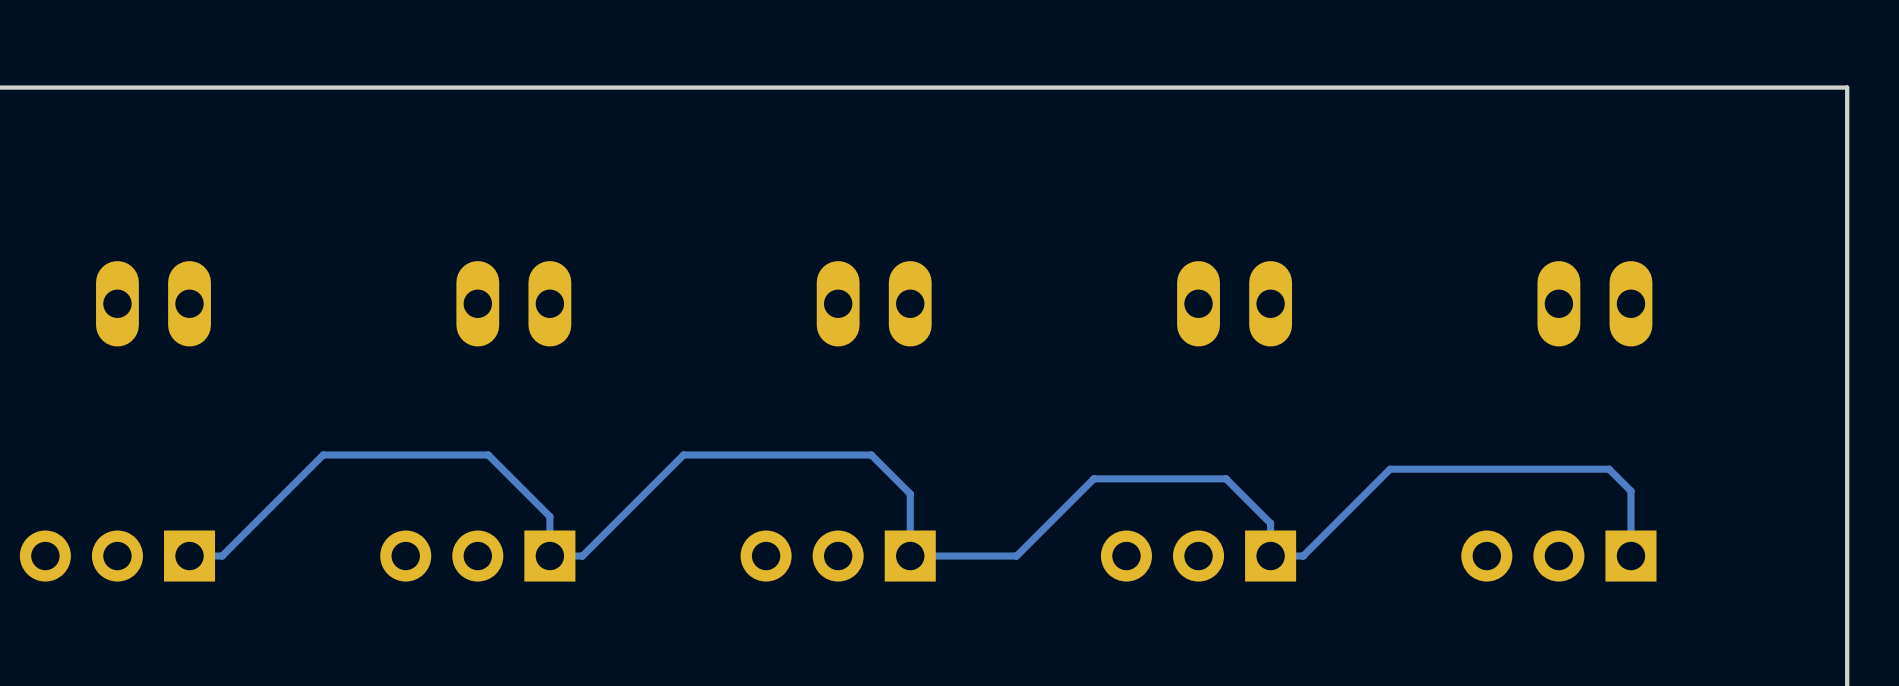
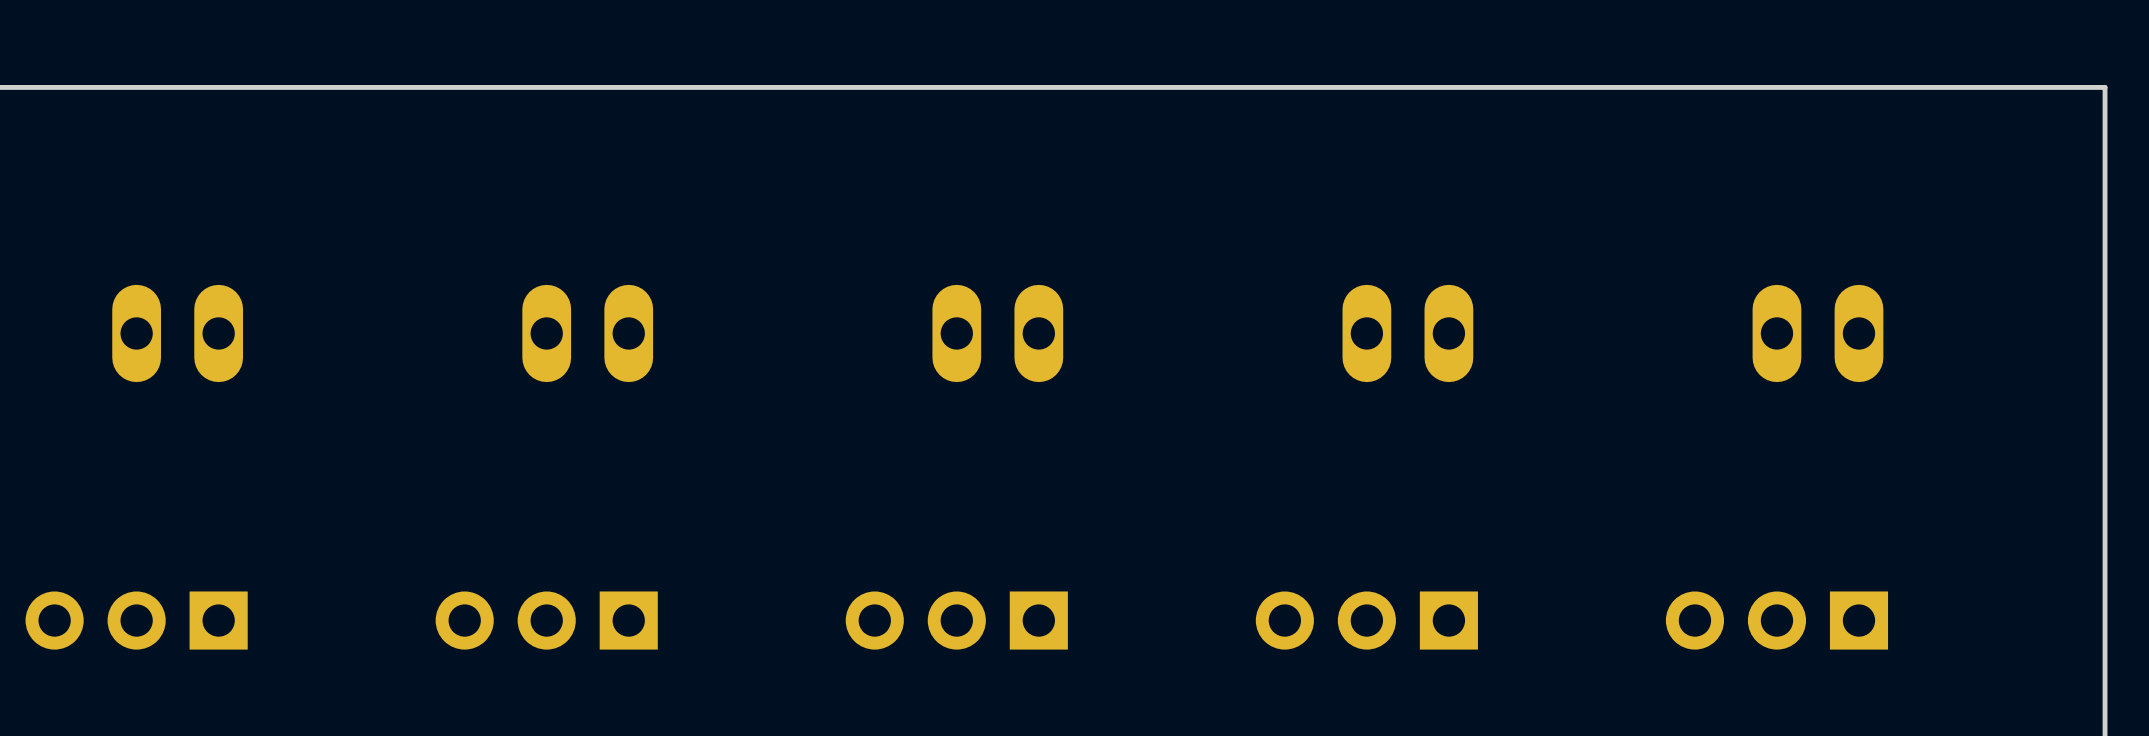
track: (1630, 556) (1630, 491) (1609, 469) (1390, 469) (1303, 556) (1270, 556) (1270, 523) (1226, 478) (1093, 478) (1016, 556) (910, 556) (910, 493) (871, 455) (683, 455) (582, 556) (549, 556) (549, 516) (488, 455) (323, 455) (222, 556) (189, 556) -> none

